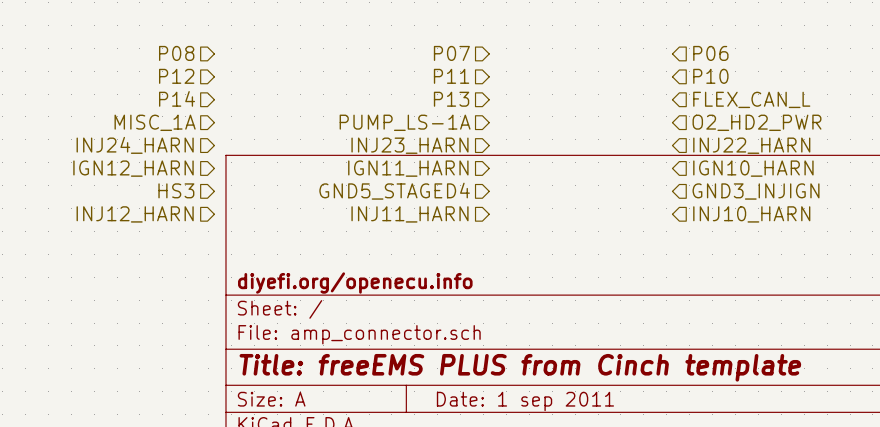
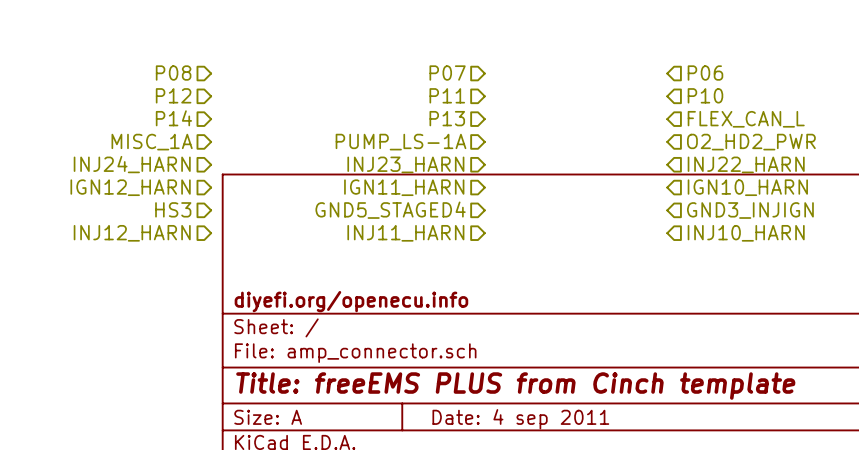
title block: Date: 1 sep 2011 (525, 401) -> Date: 4 sep 2011 (520, 419)

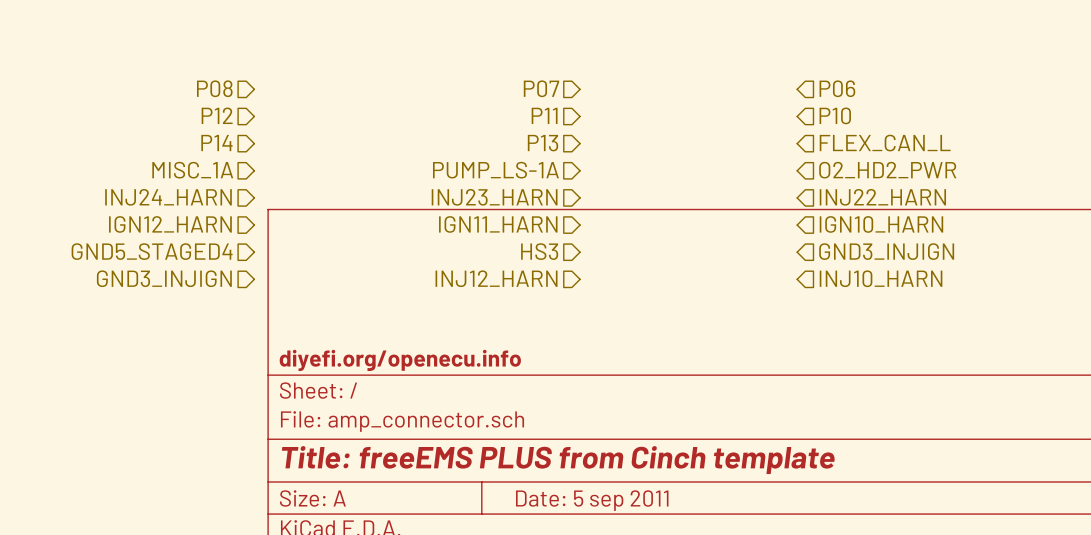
hierarchical label: HS3 (173, 209) -> GND5_STAGED4 (152, 251)
hierarchical label: GND5_STAGED4 (390, 210) -> HS3 (539, 251)
hierarchical label: INJ12_HARN (132, 233) -> GND3_INJIGN (164, 278)
hierarchical label: INJ11_HARN (405, 233) -> INJ12_HARN (496, 278)
title block: Date: 4 sep 2011 (520, 419) -> Date: 5 sep 2011 (592, 500)

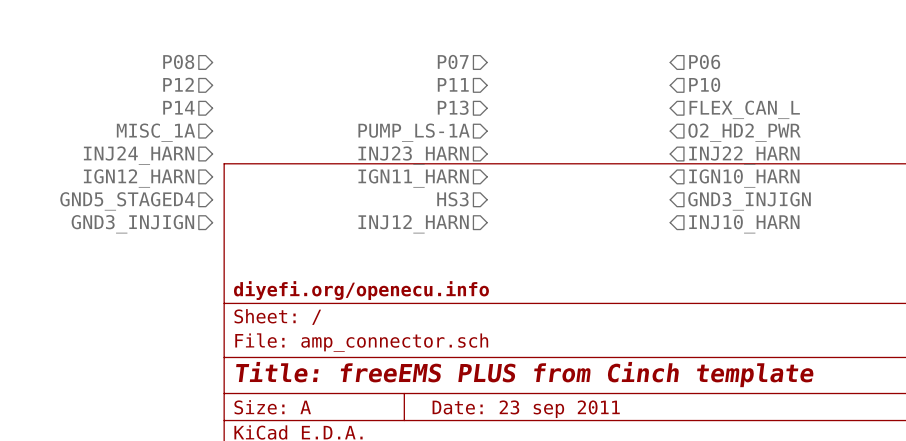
title block: Date: 5 sep 2011 (592, 500) -> Date: 23 sep 2011 (526, 409)

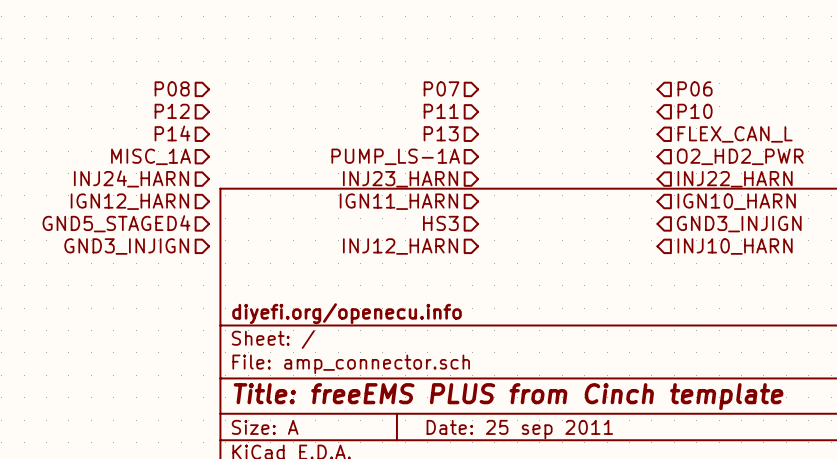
title block: Date: 23 sep 2011 (526, 409) -> Date: 25 sep 2011 (519, 429)

